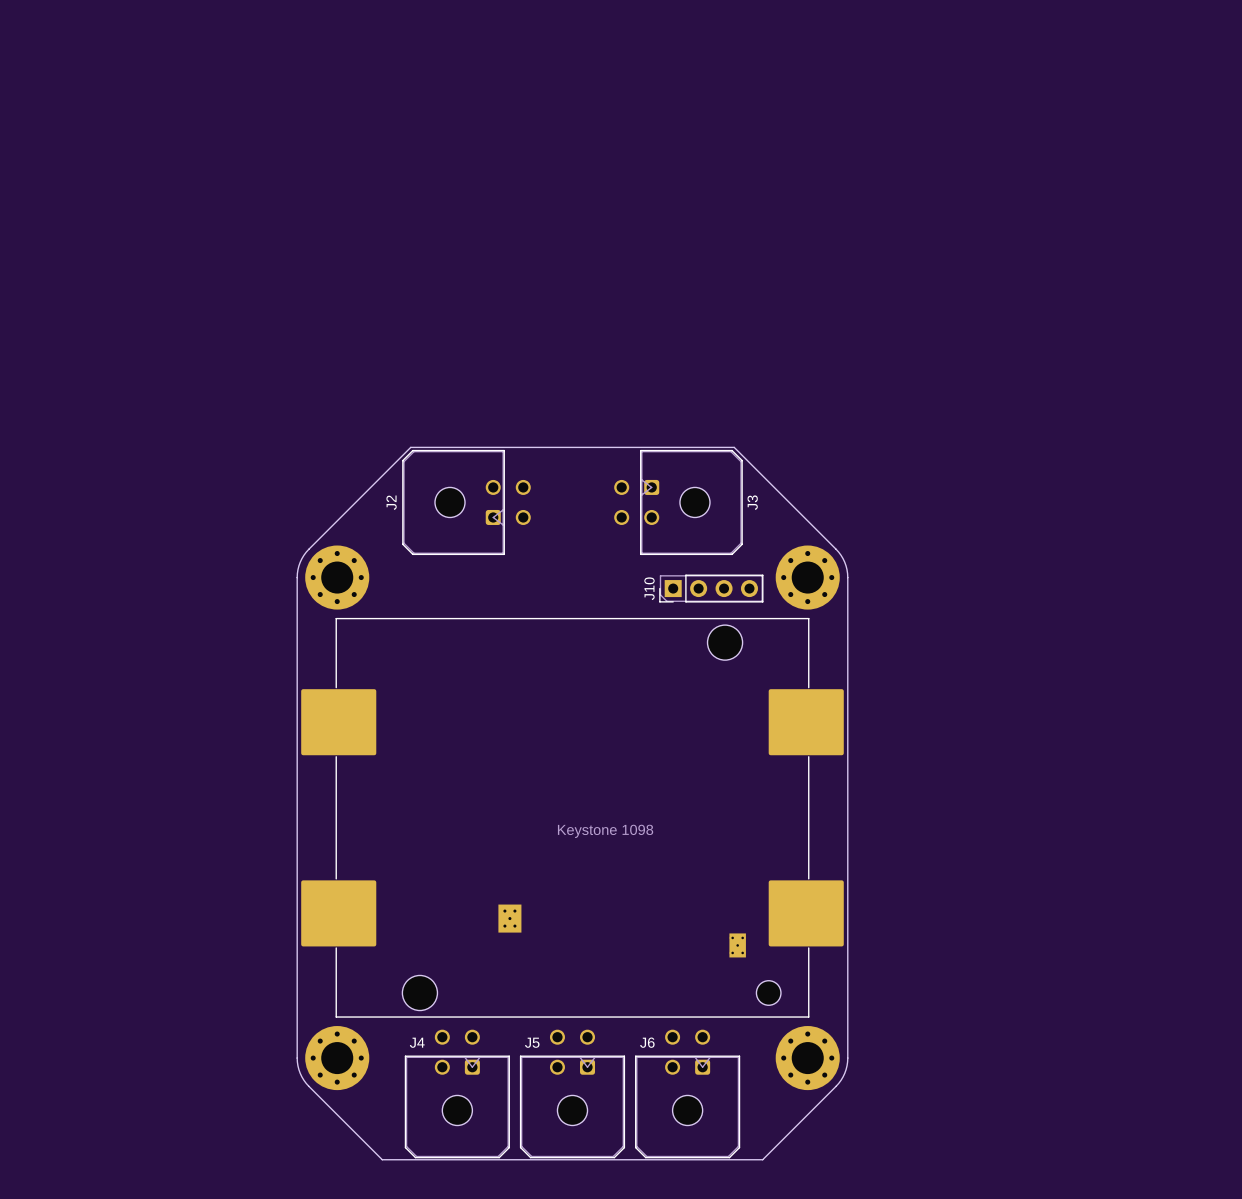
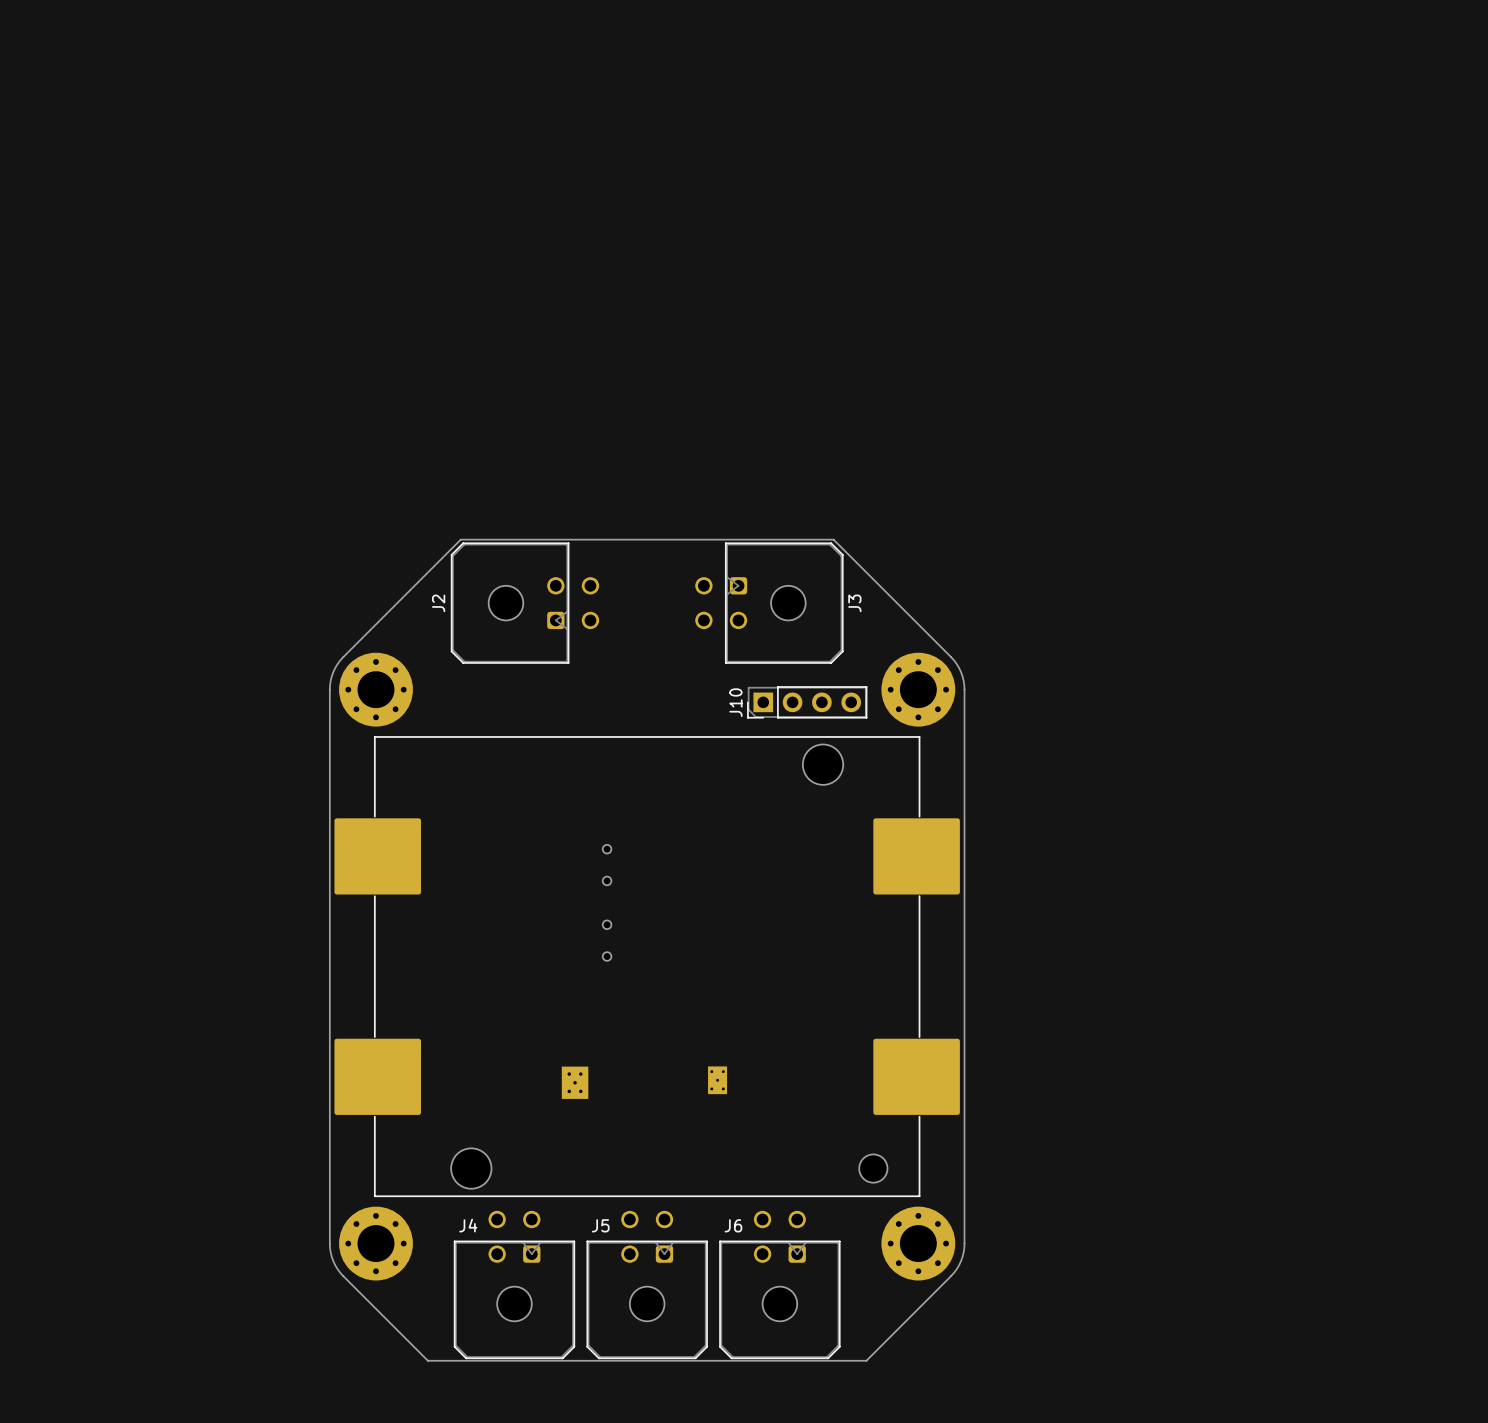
part: none -> (607, 865)
part: none -> (607, 940)
part value: Keystone 1098 (605, 831) -> none
part position: (737, 945) -> (717, 1080)

